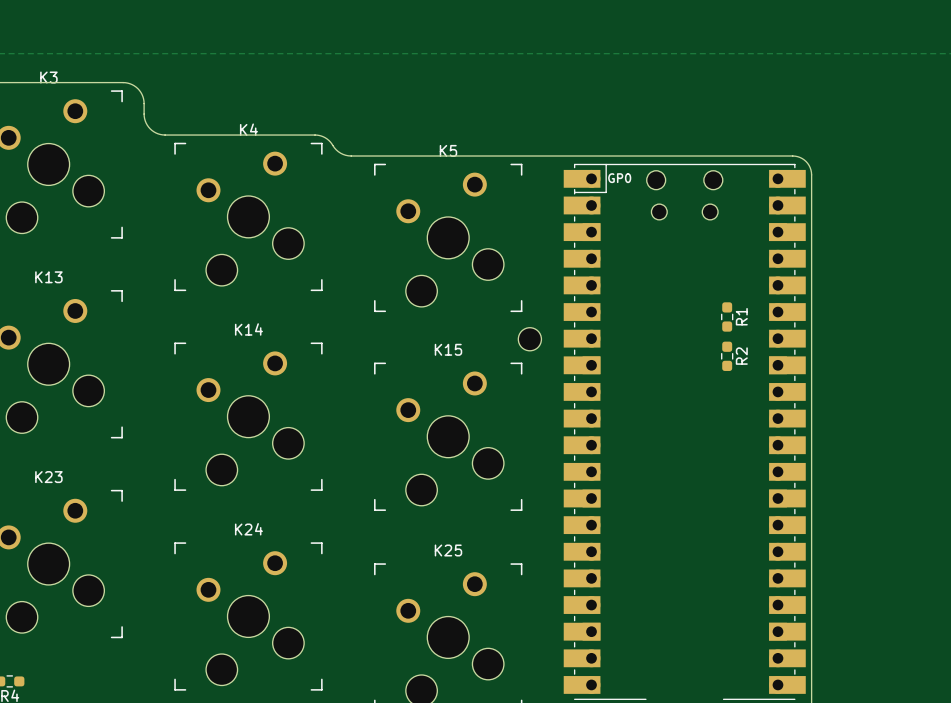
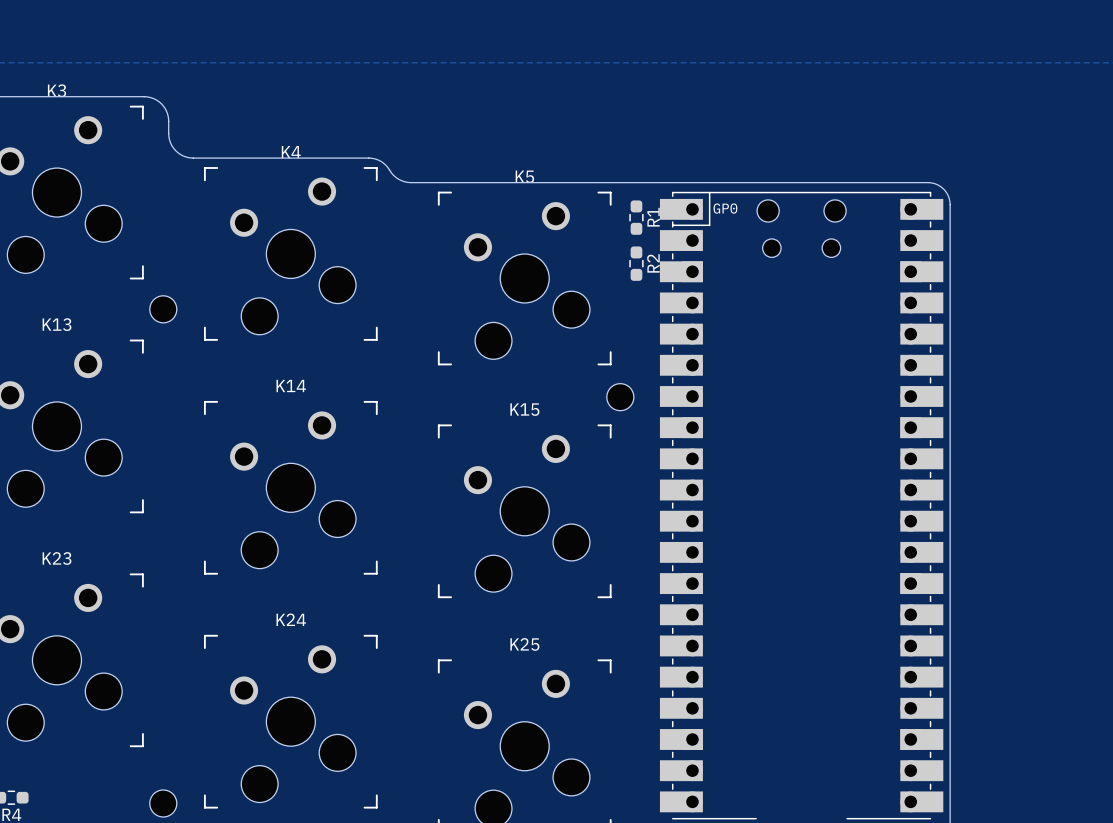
part: none -> (163, 309)
R1 position: (727, 316) -> (636, 217)
R2 position: (727, 356) -> (636, 263)
part: none -> (163, 803)

